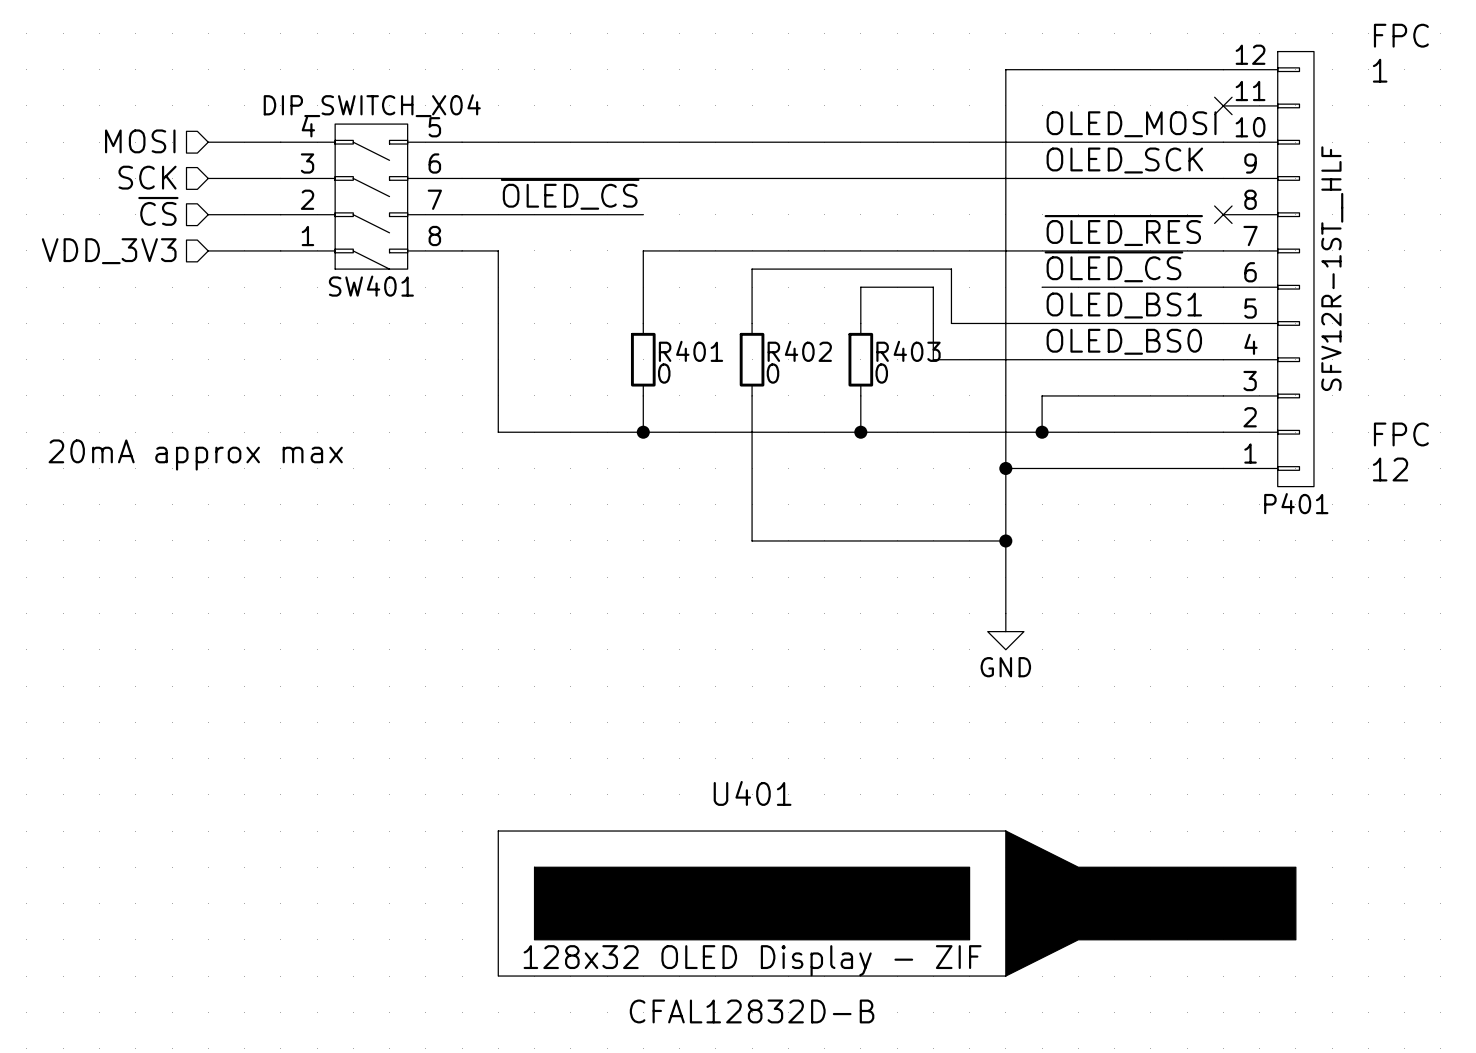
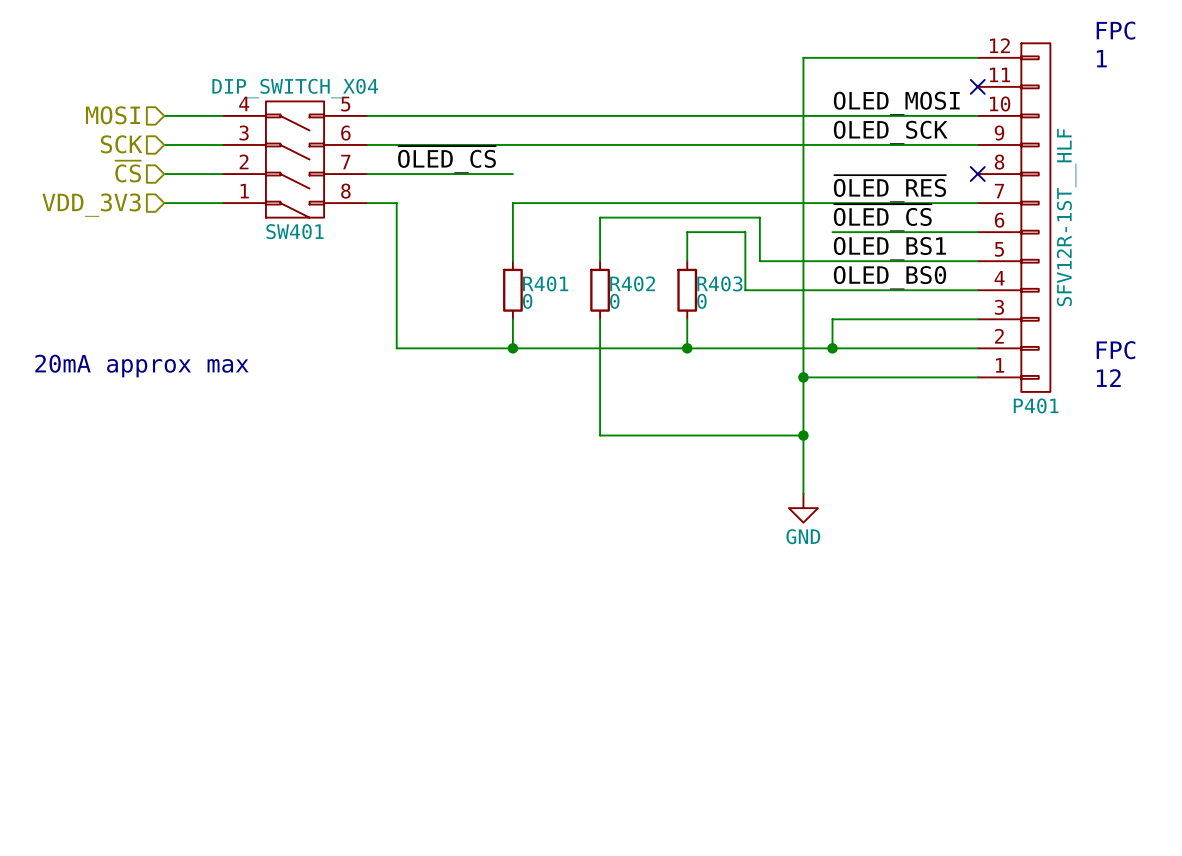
U401: CFAL12832D-B (897, 903) -> none

